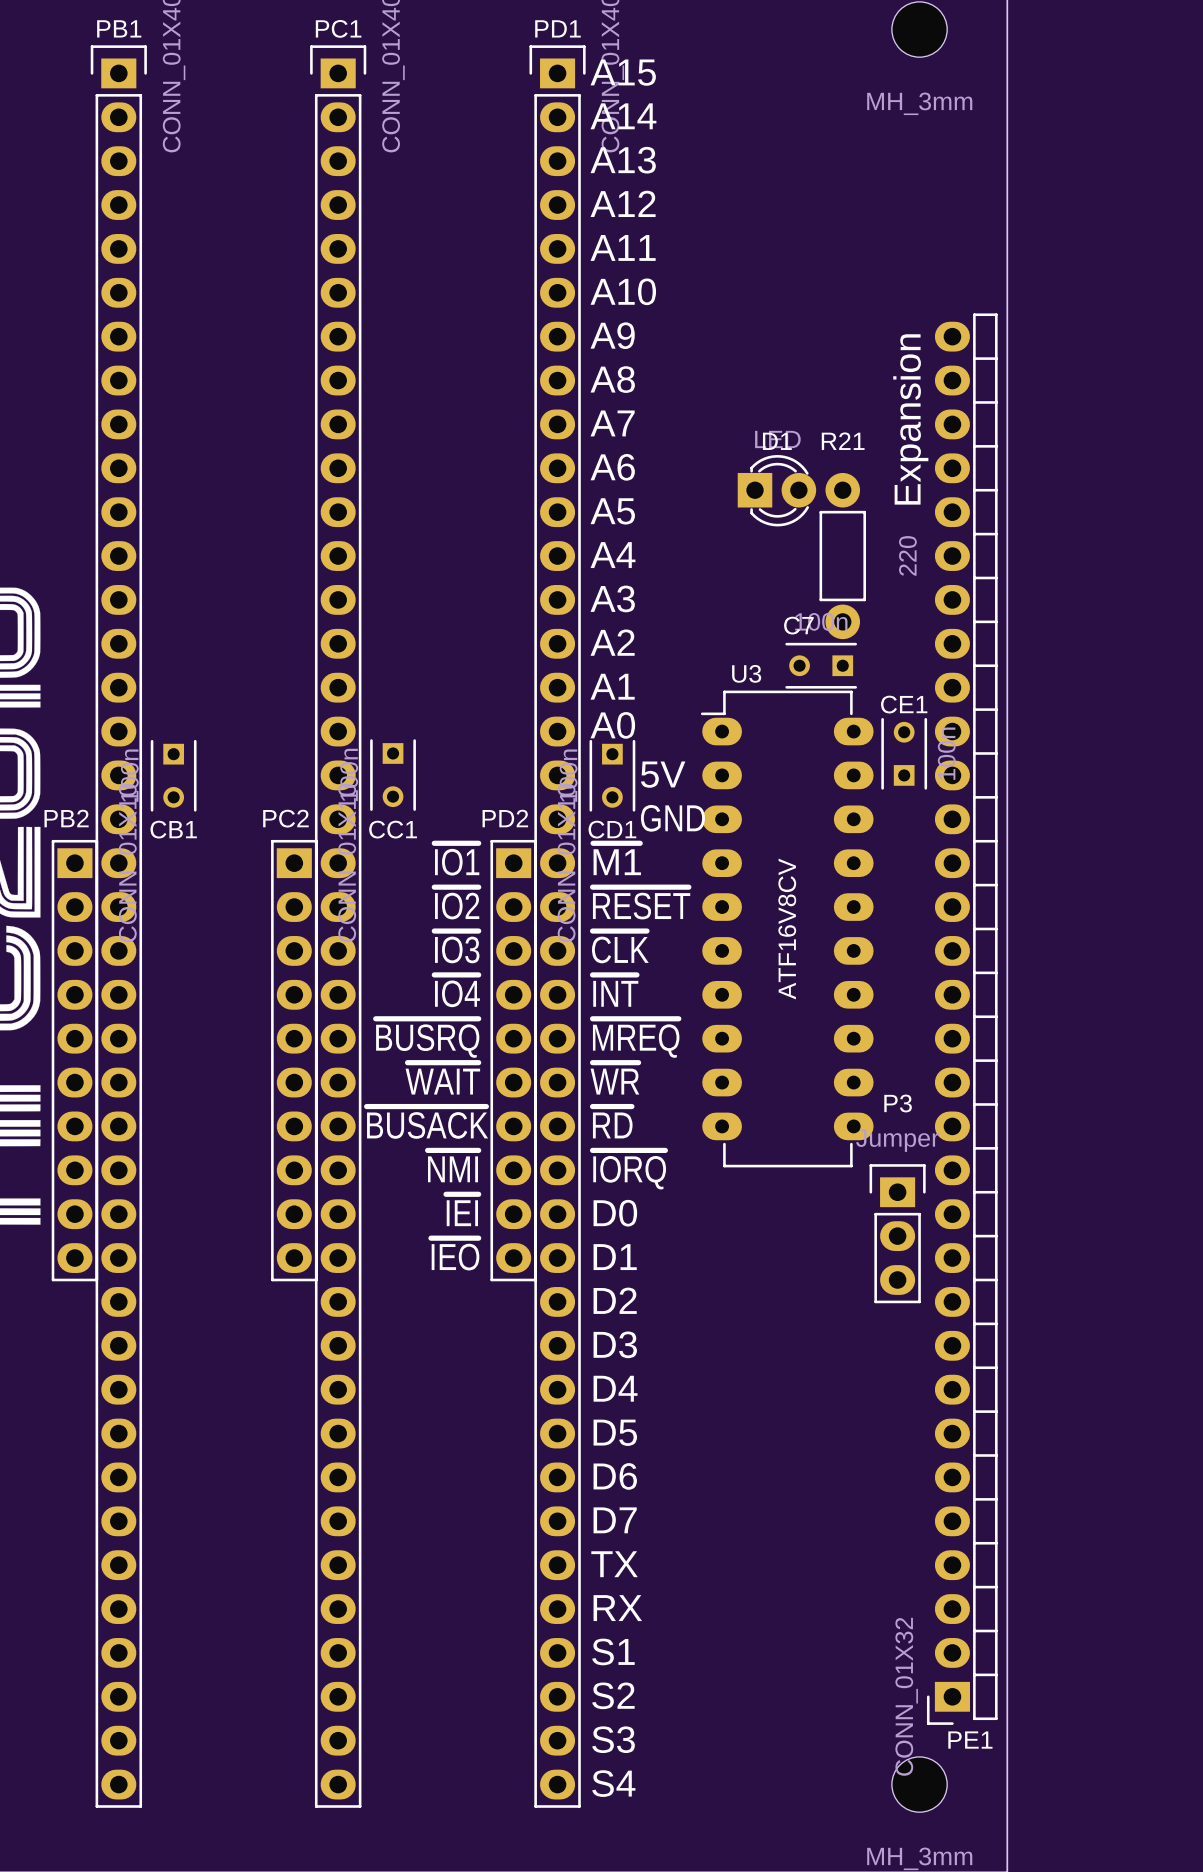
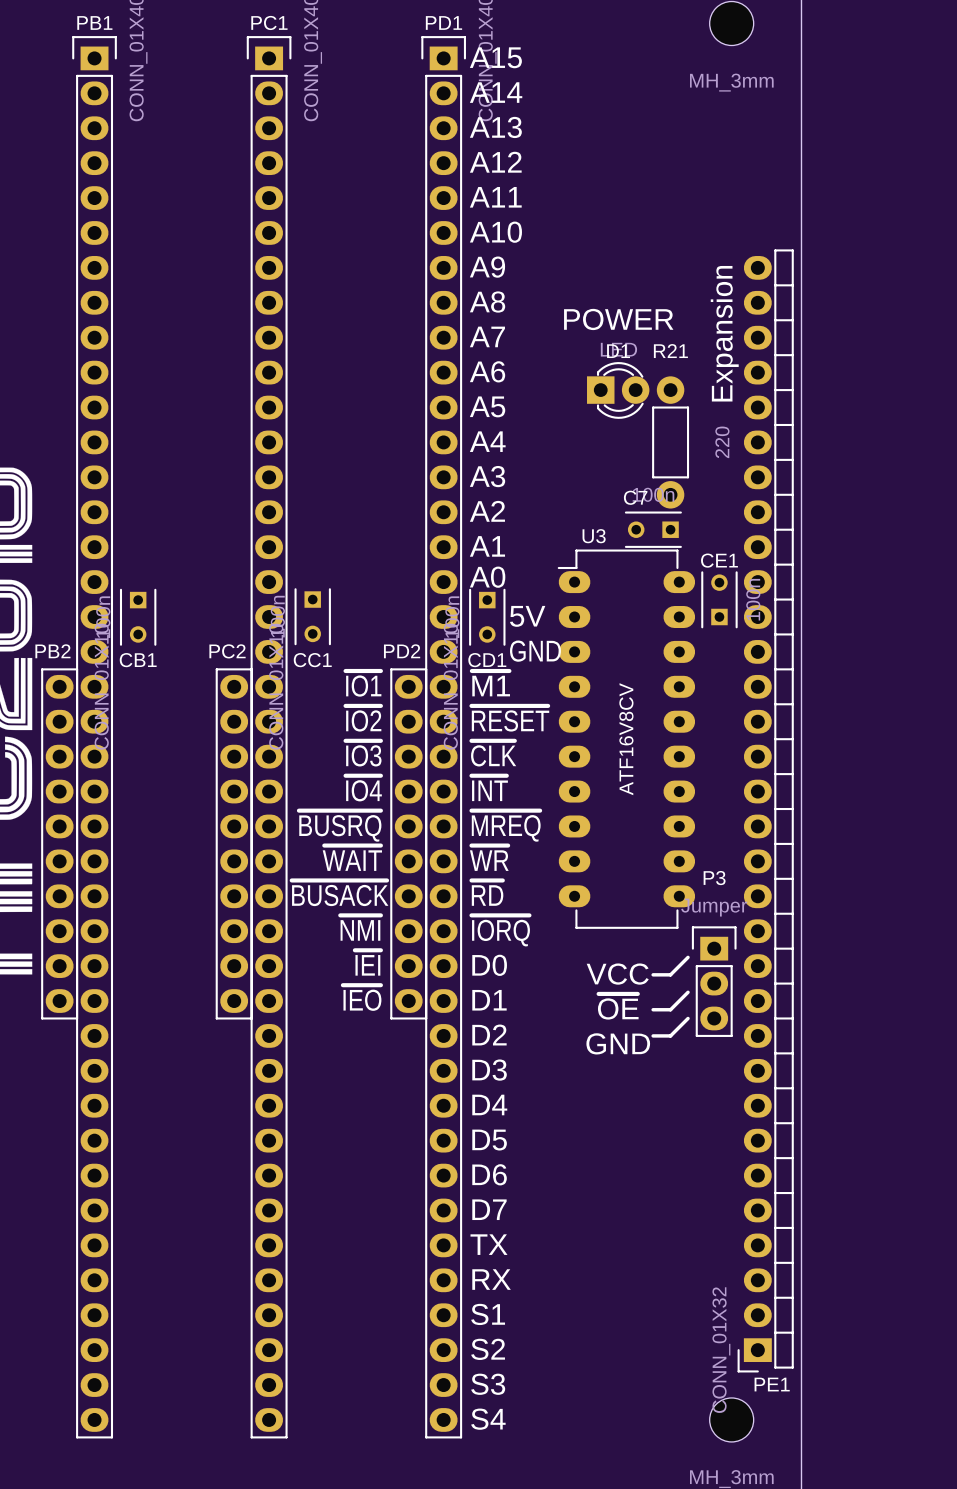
text: none -> POWER (618, 319)
PB2 footprint: [51, 839, 99, 1282] -> [41, 668, 79, 1020]
PC2 footprint: [271, 839, 318, 1282] -> [215, 668, 253, 1020]
PD2 footprint: [490, 839, 537, 1282] -> [390, 668, 428, 1020]
line: none -> (688, 957) (670, 974) (653, 974)
text: none -> VCC (617, 974)
line: none -> (688, 992) (670, 1009) (653, 1009)
text: none -> ~{OE} (618, 1006)
line: none -> (688, 1018) (670, 1035) (653, 1035)
text: none -> GND (618, 1043)

